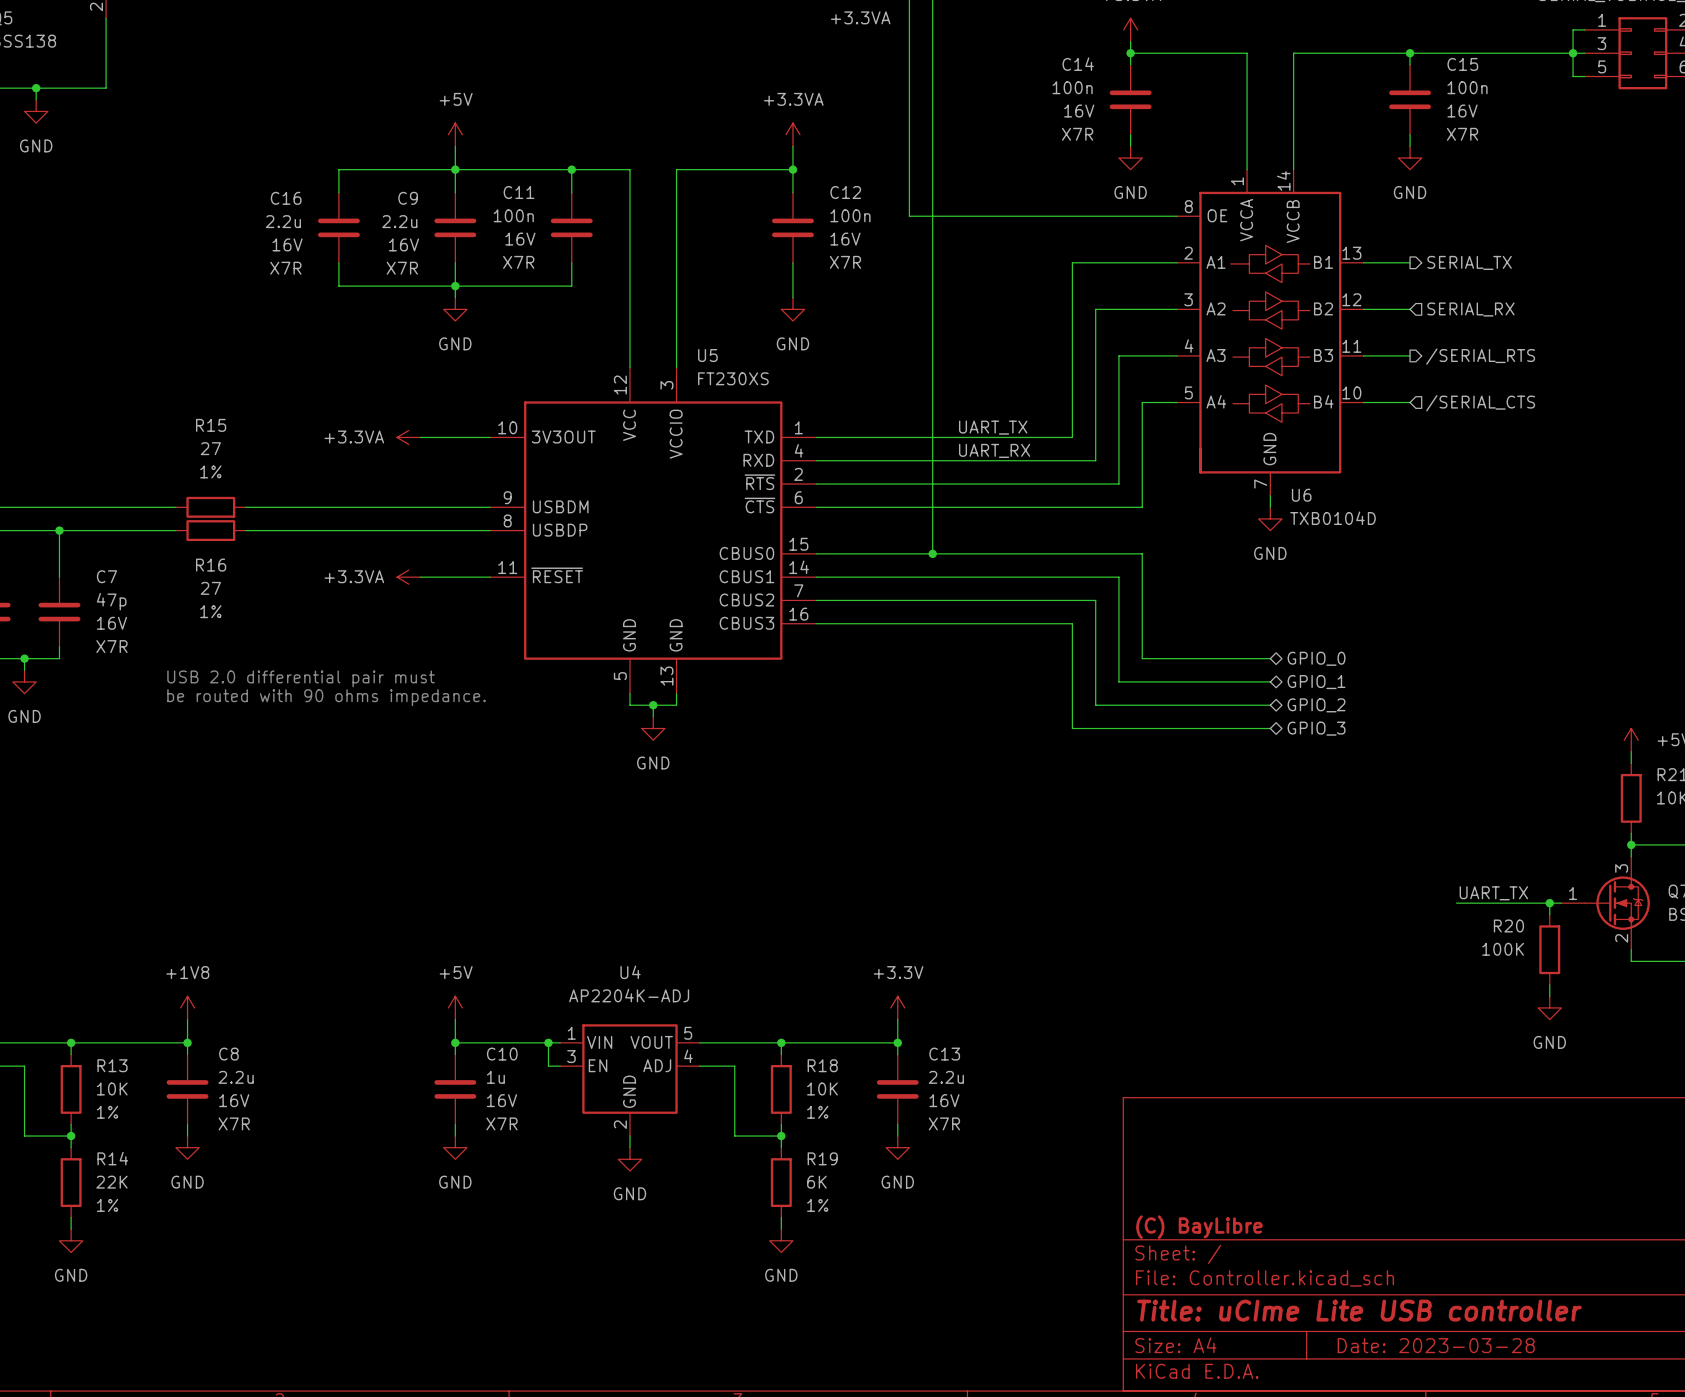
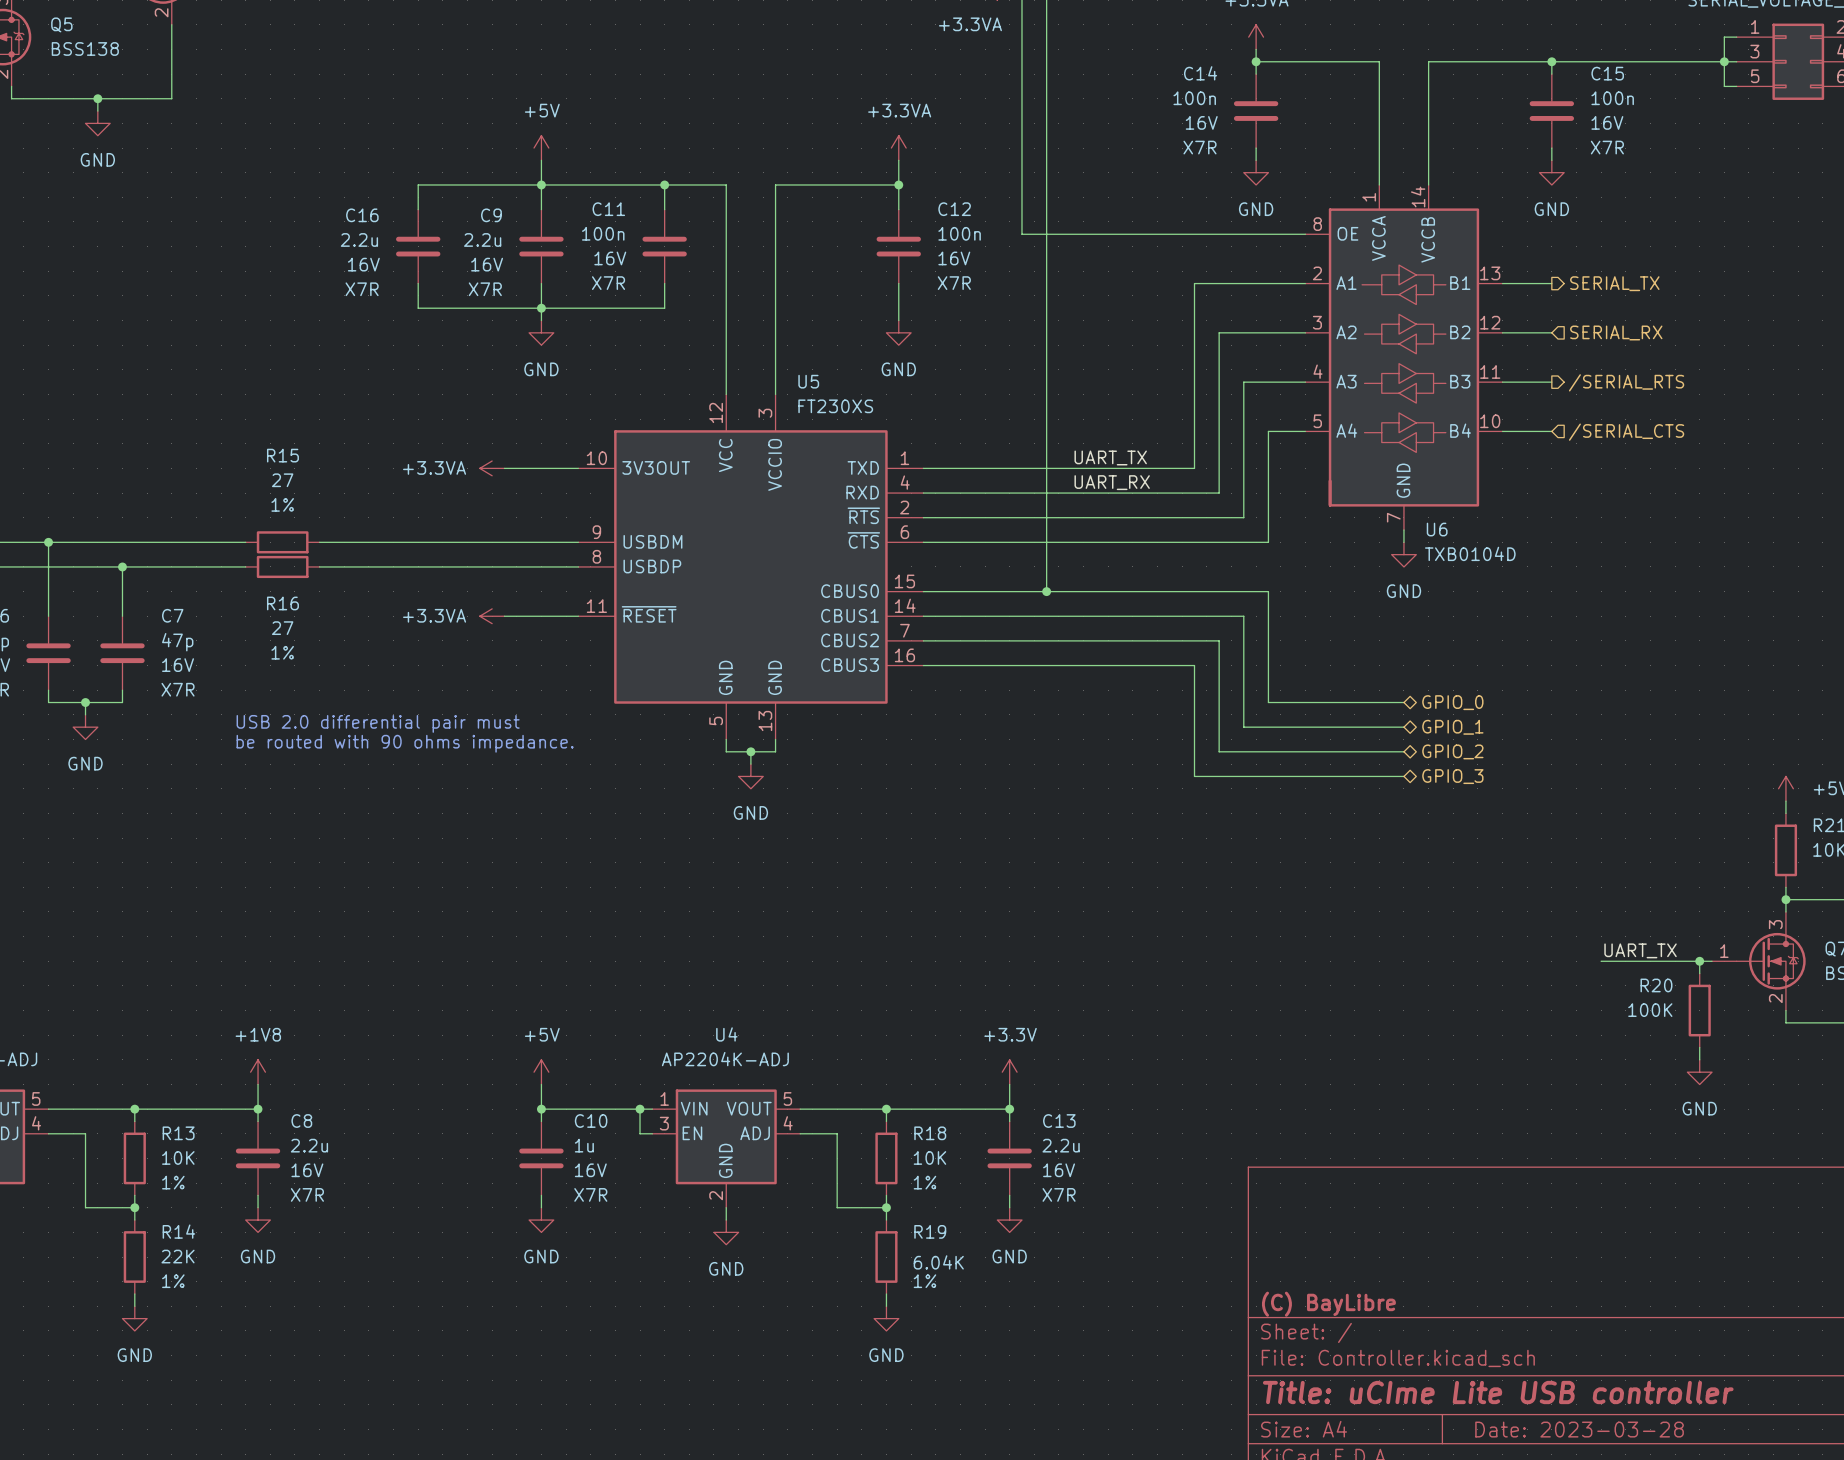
R19 value: 6K (816, 1182) -> 6.04K (938, 1262)

